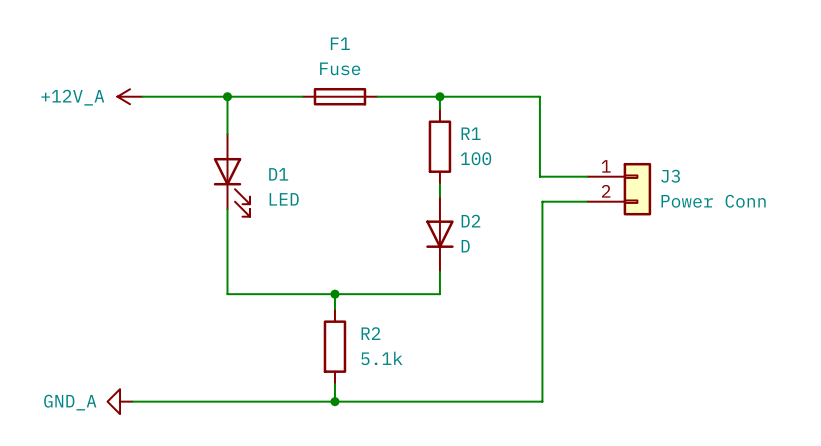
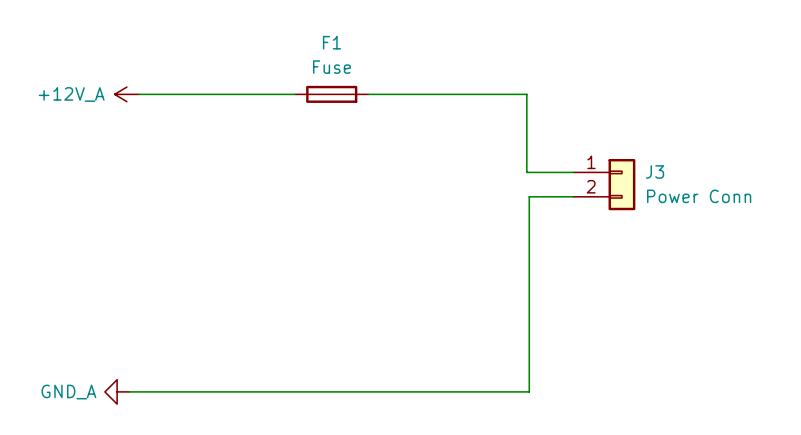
wire: (227, 96) (227, 134) -> none
junction: (227, 96) -> none
wire: (439, 96) (439, 109) -> none
junction: (439, 96) -> none
R1: 100 (439, 146) -> none
D1: LED (231, 175) -> none
wire: (439, 184) (439, 196) -> none
wire: (227, 209) (227, 294) (439, 294) (439, 271) -> none
D2: D (439, 234) -> none
wire: (334, 294) (334, 309) -> none
junction: (334, 294) -> none
R2: 5.1k (334, 346) -> none
wire: (334, 384) (334, 401) -> none
junction: (334, 401) -> none

